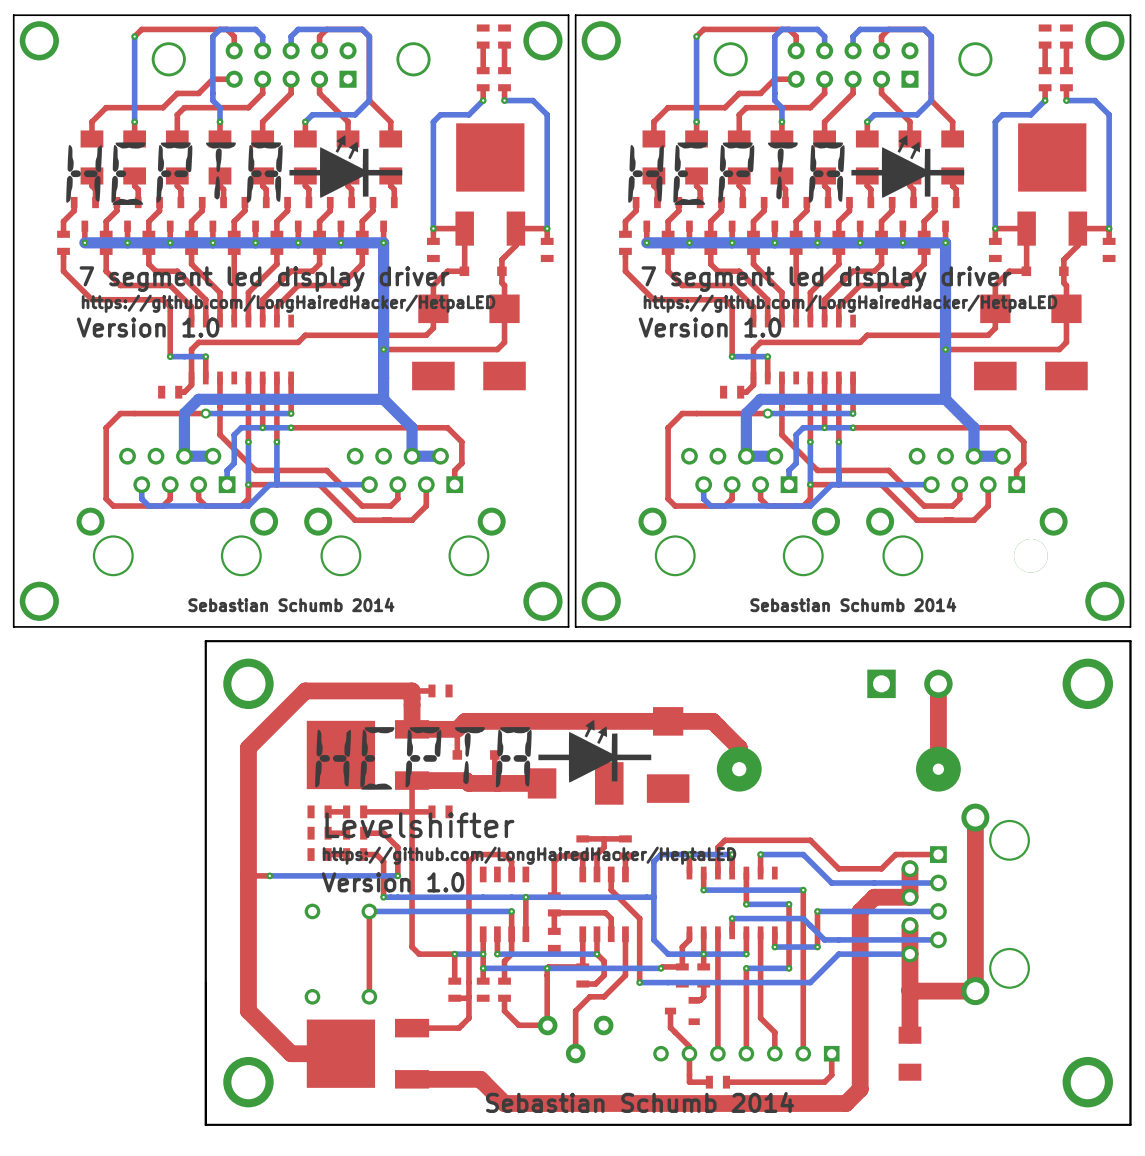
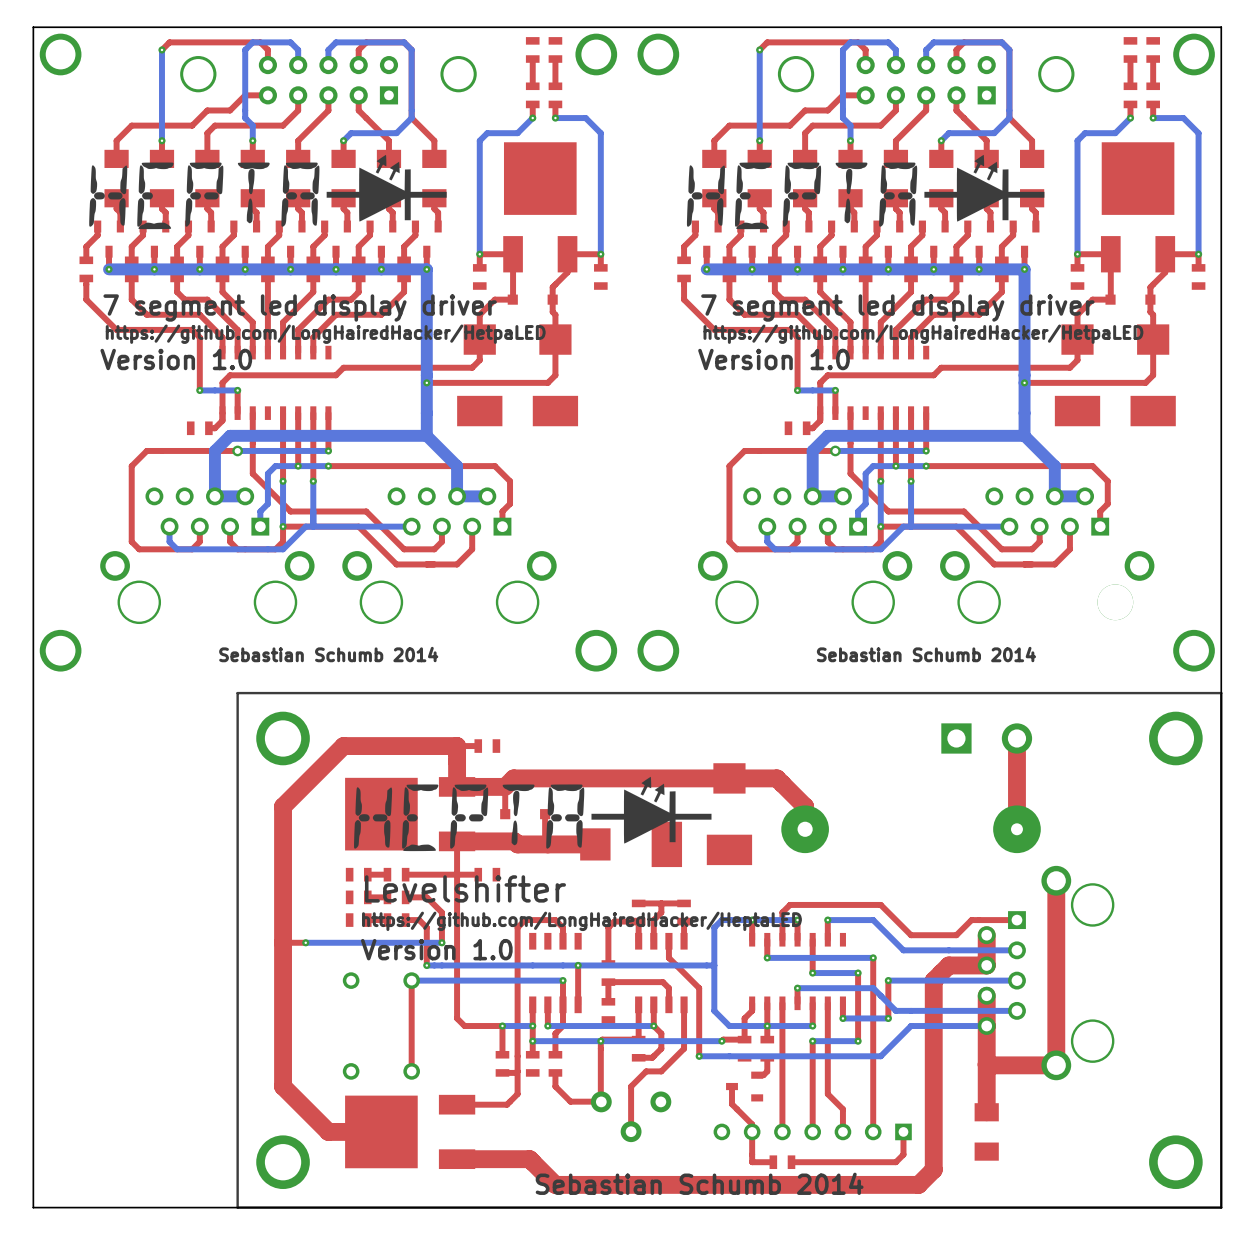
board edge: (568, 15) (568, 626) (13, 626) -> (237, 1207) (33, 1207) (33, 677)
board edge: (575, 15) (575, 626) (1130, 626) -> (631, 27) (623, 27)
board edge: (1130, 641) (205, 641) (205, 1124) -> (1221, 693) (1221, 677)

